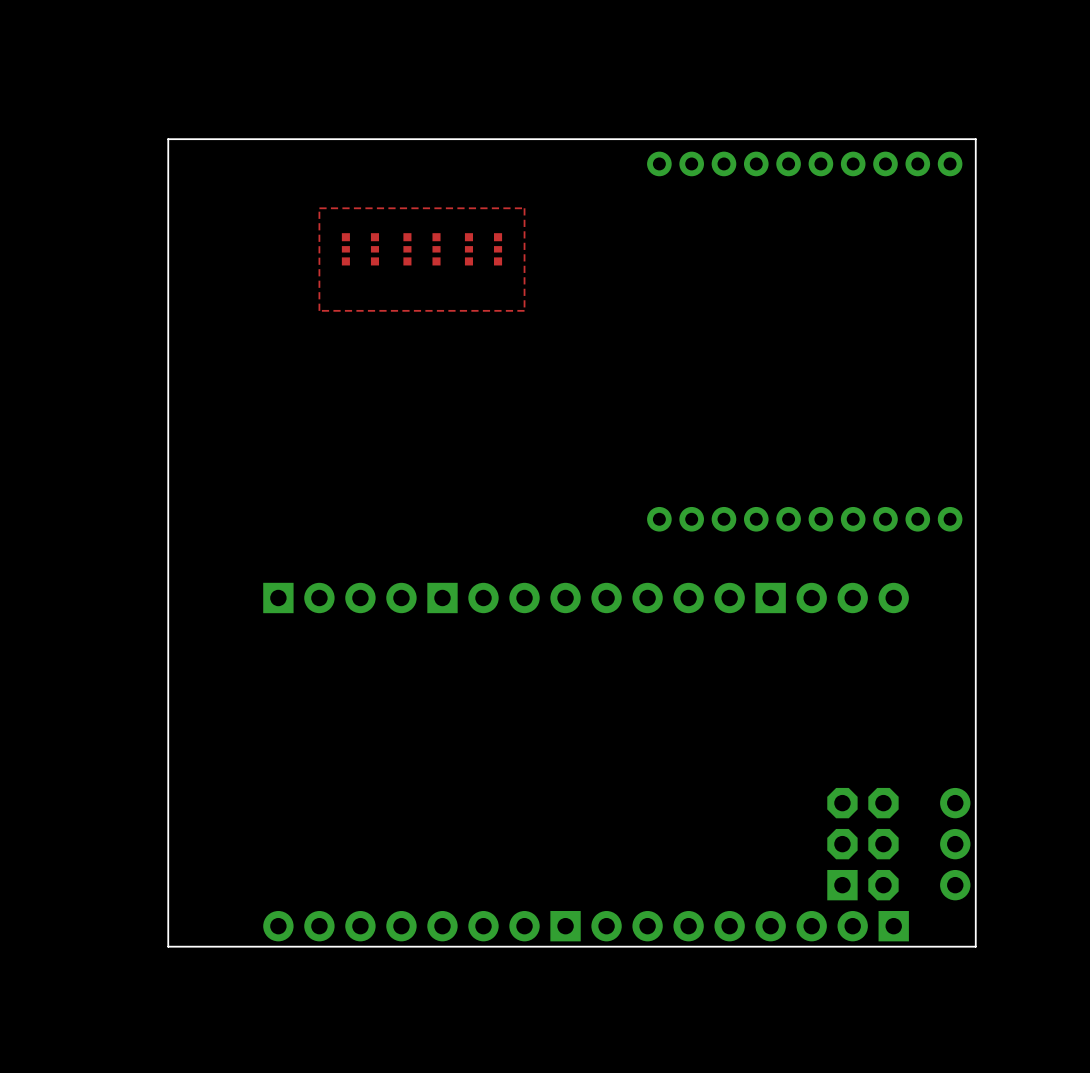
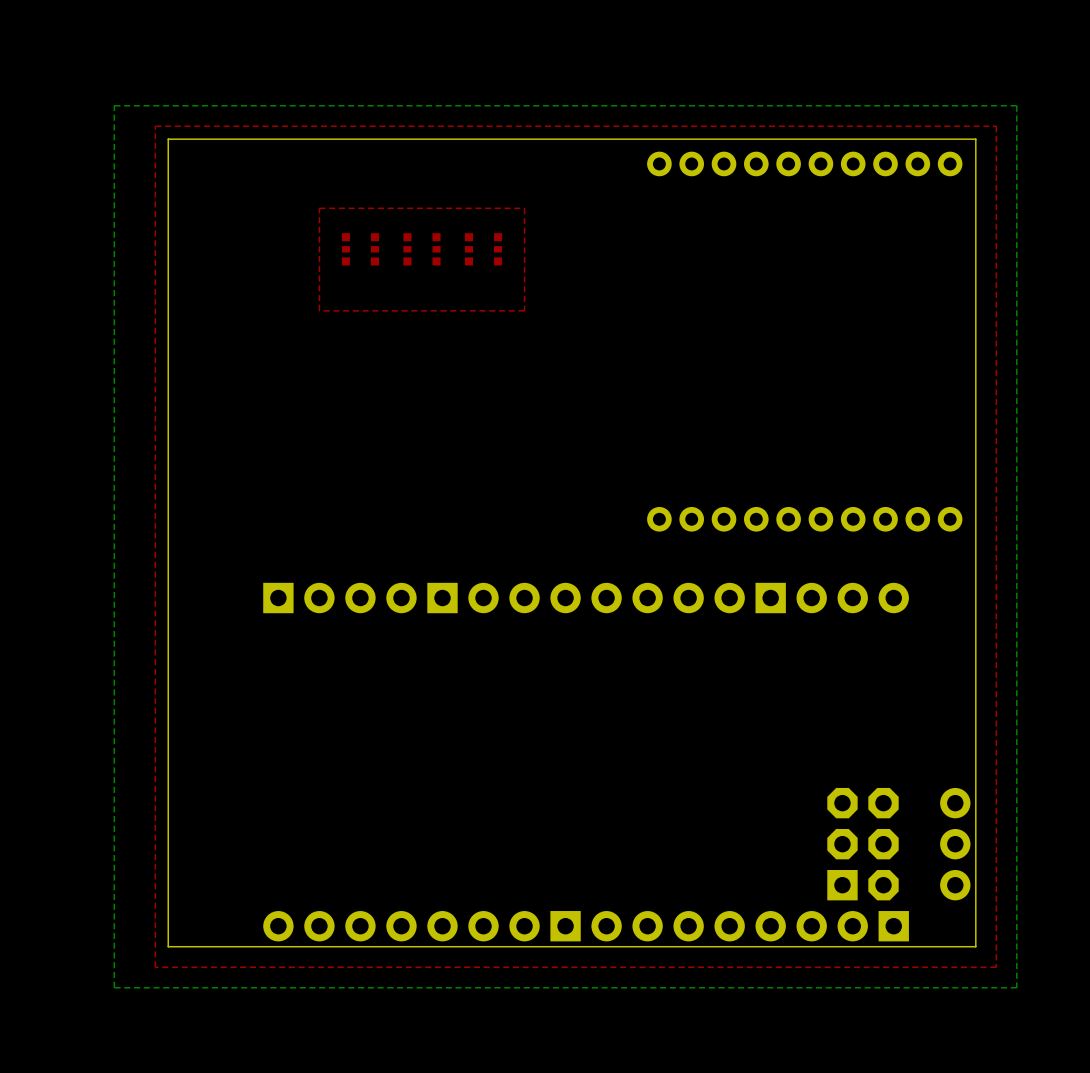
bottom zone outline: none -> (1016, 105) (1016, 987) (114, 987) (114, 105) (1016, 105)
top zone outline: none -> (996, 126) (996, 967) (155, 967) (155, 126) (996, 126)

